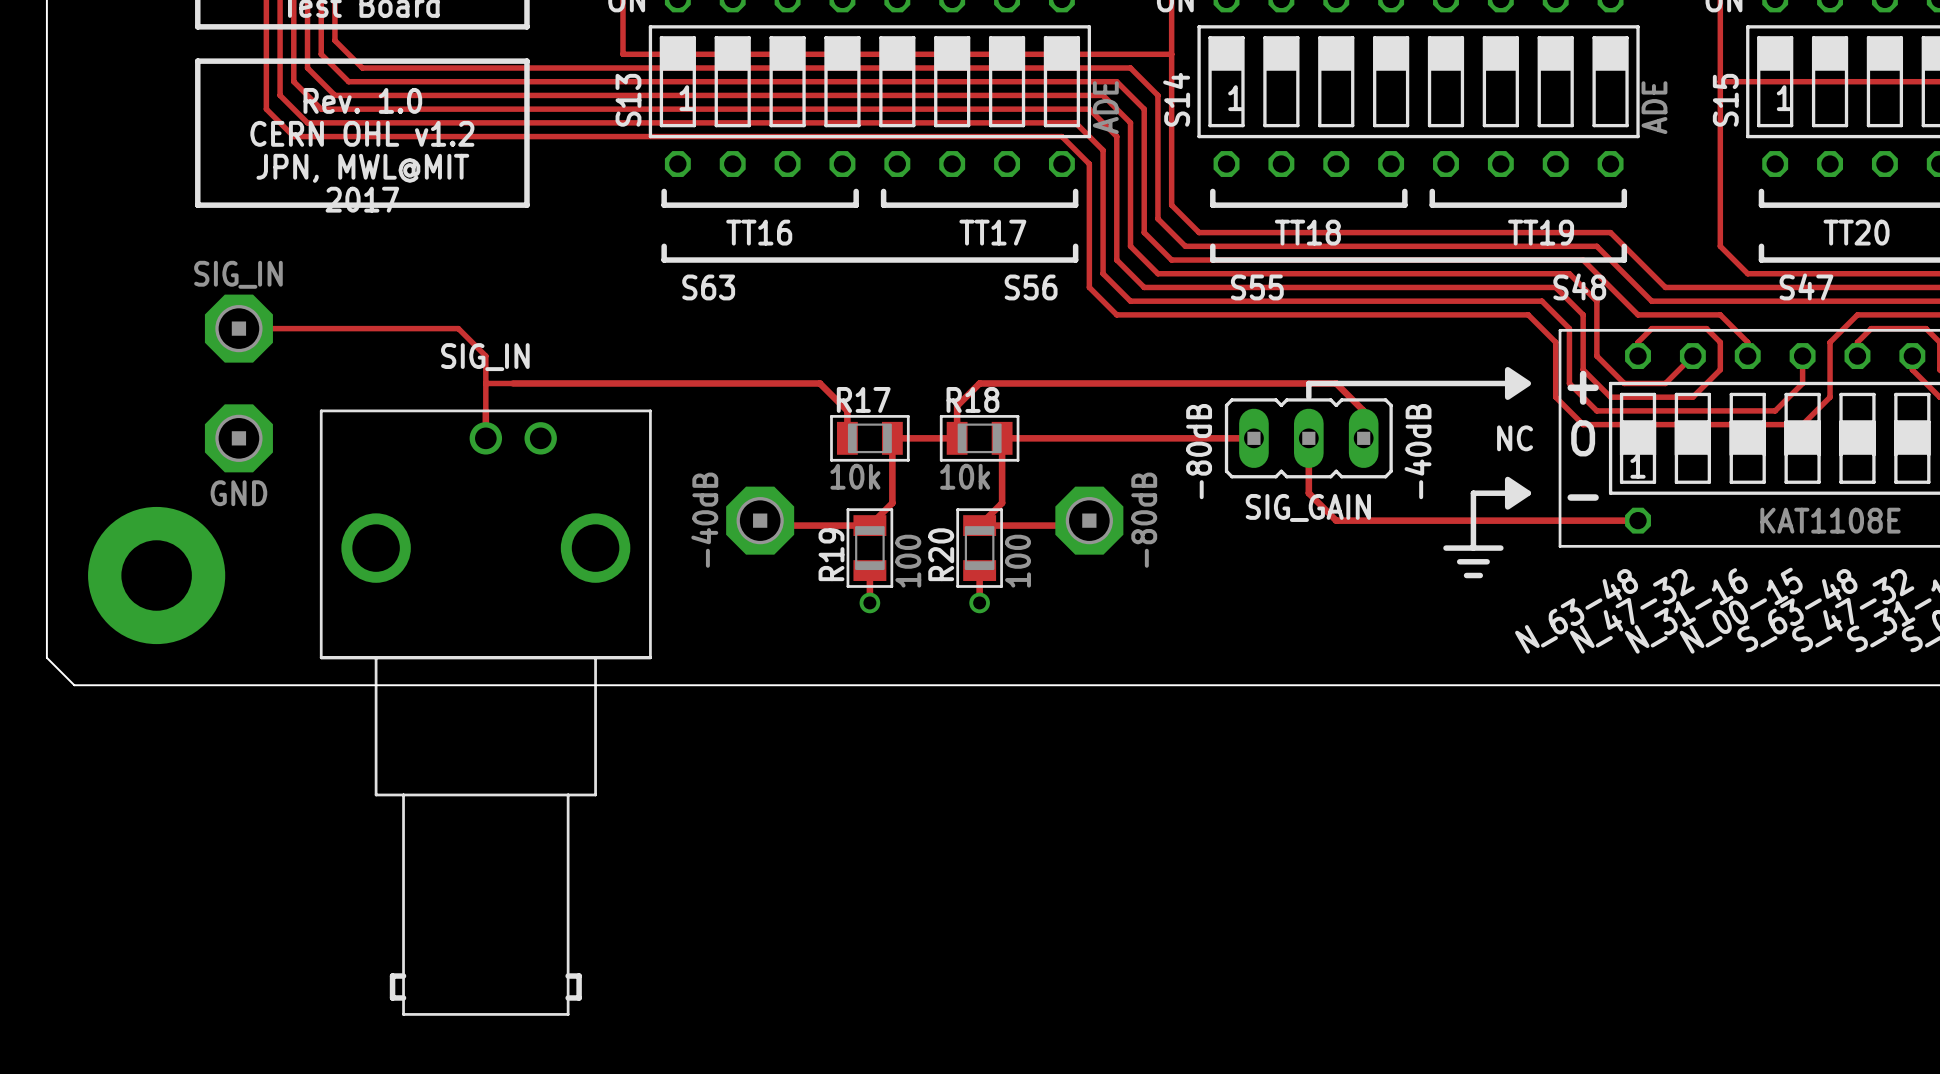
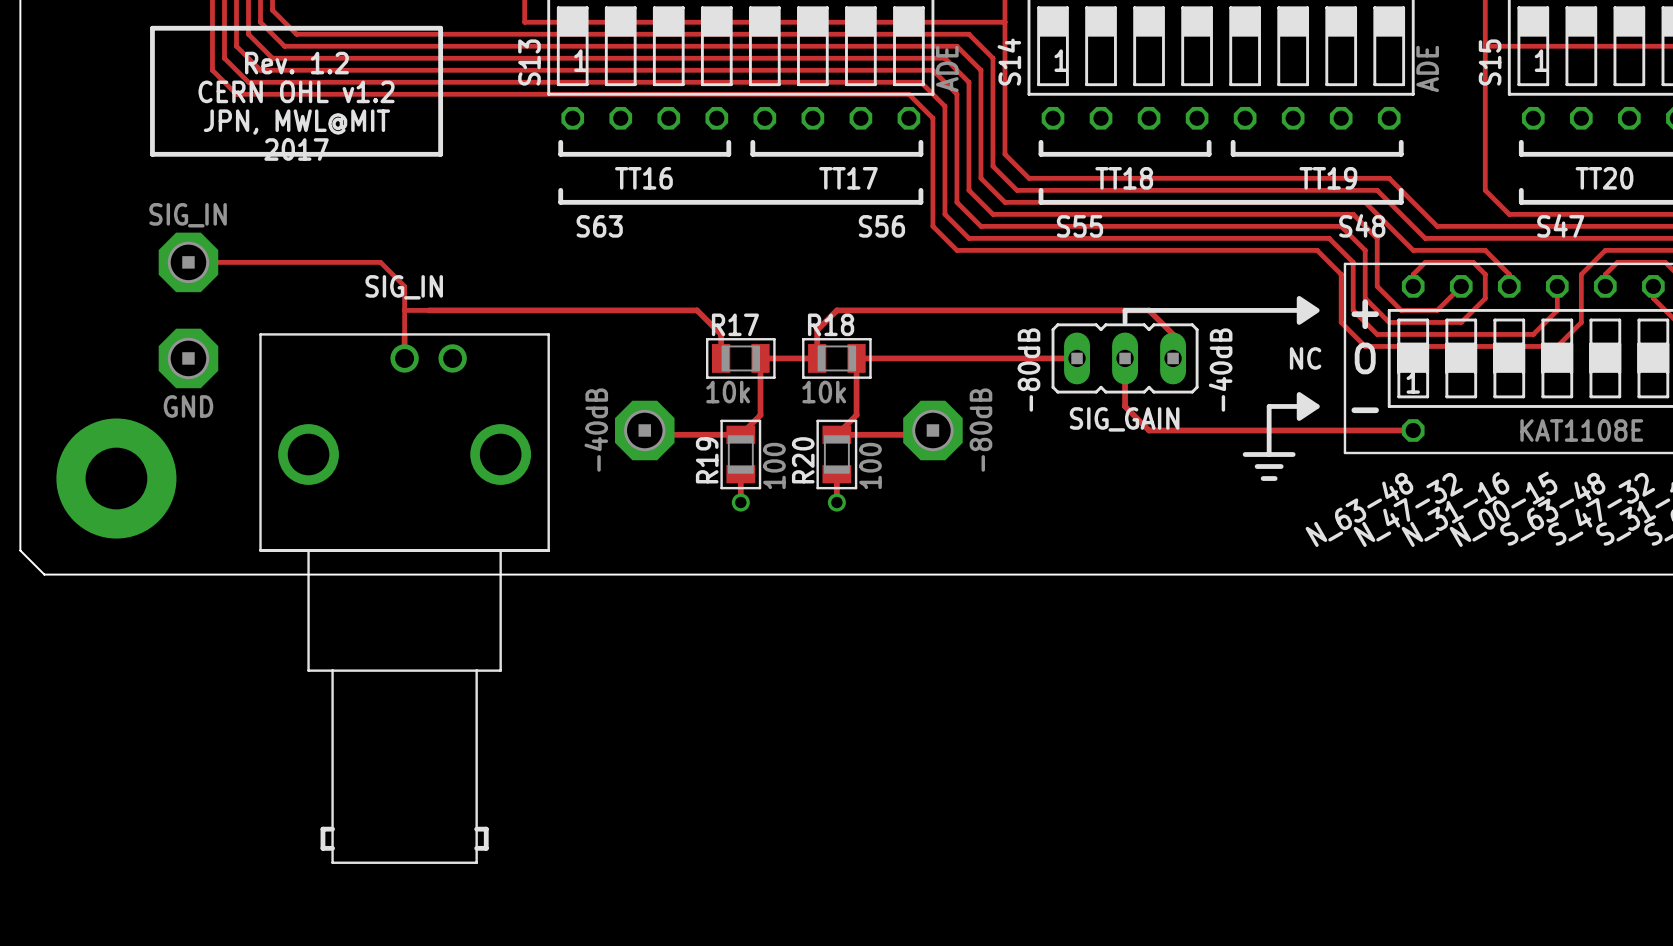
text: Rev. 1.0 (362, 100) -> Rev. 1.2 (296, 63)

